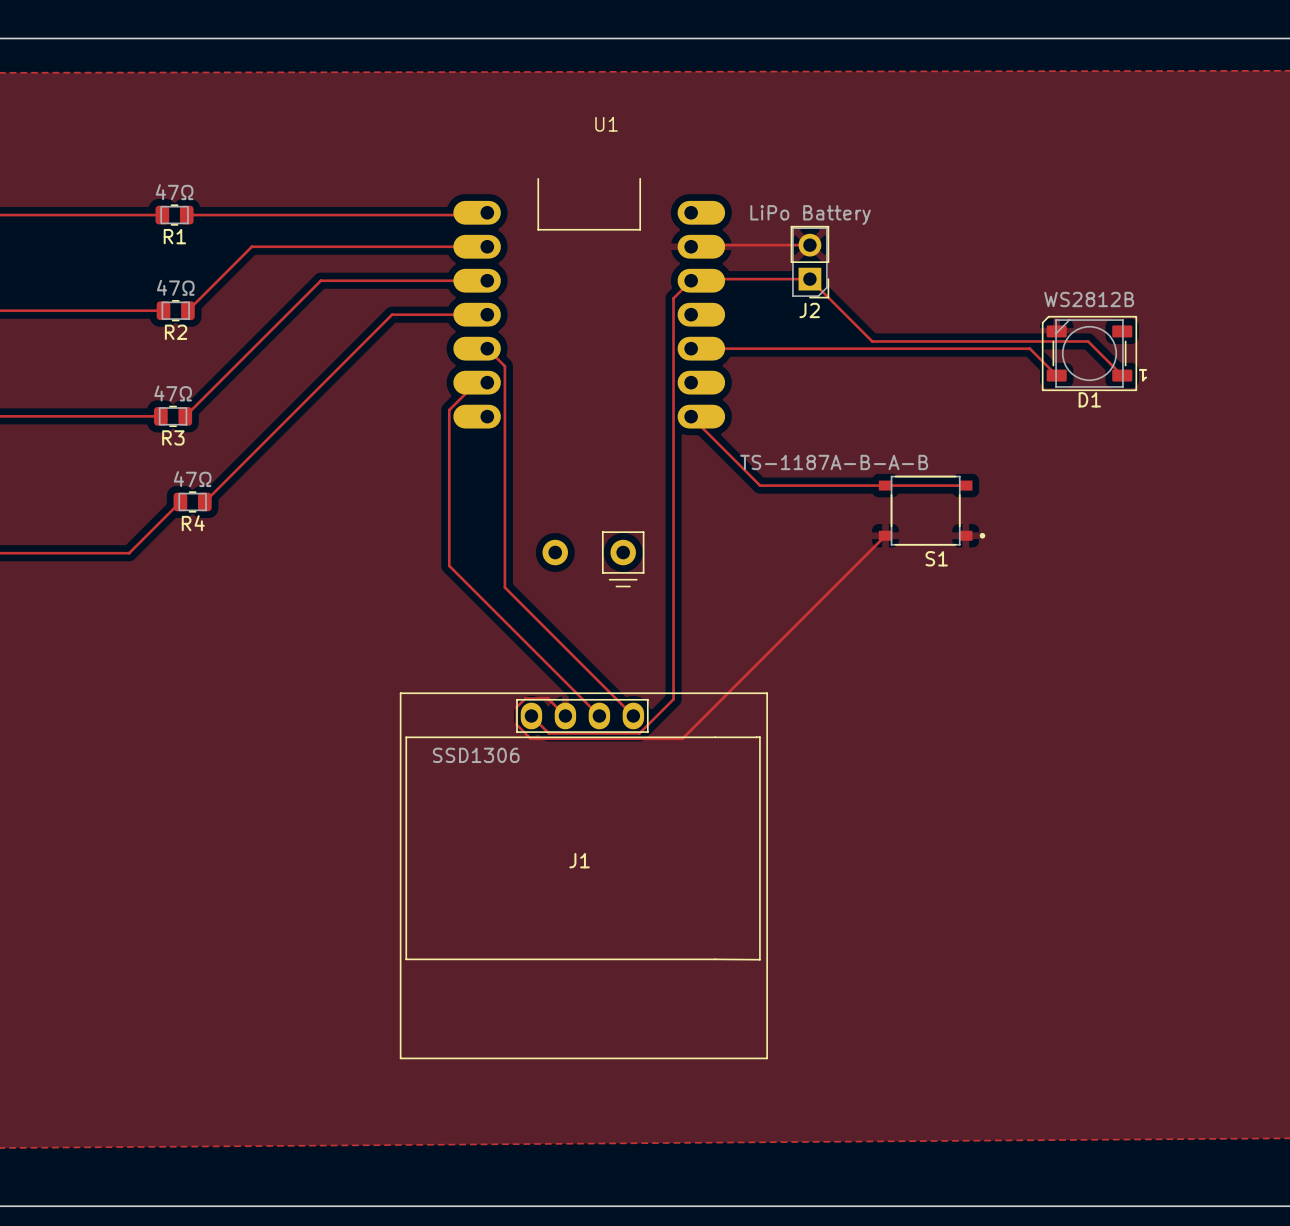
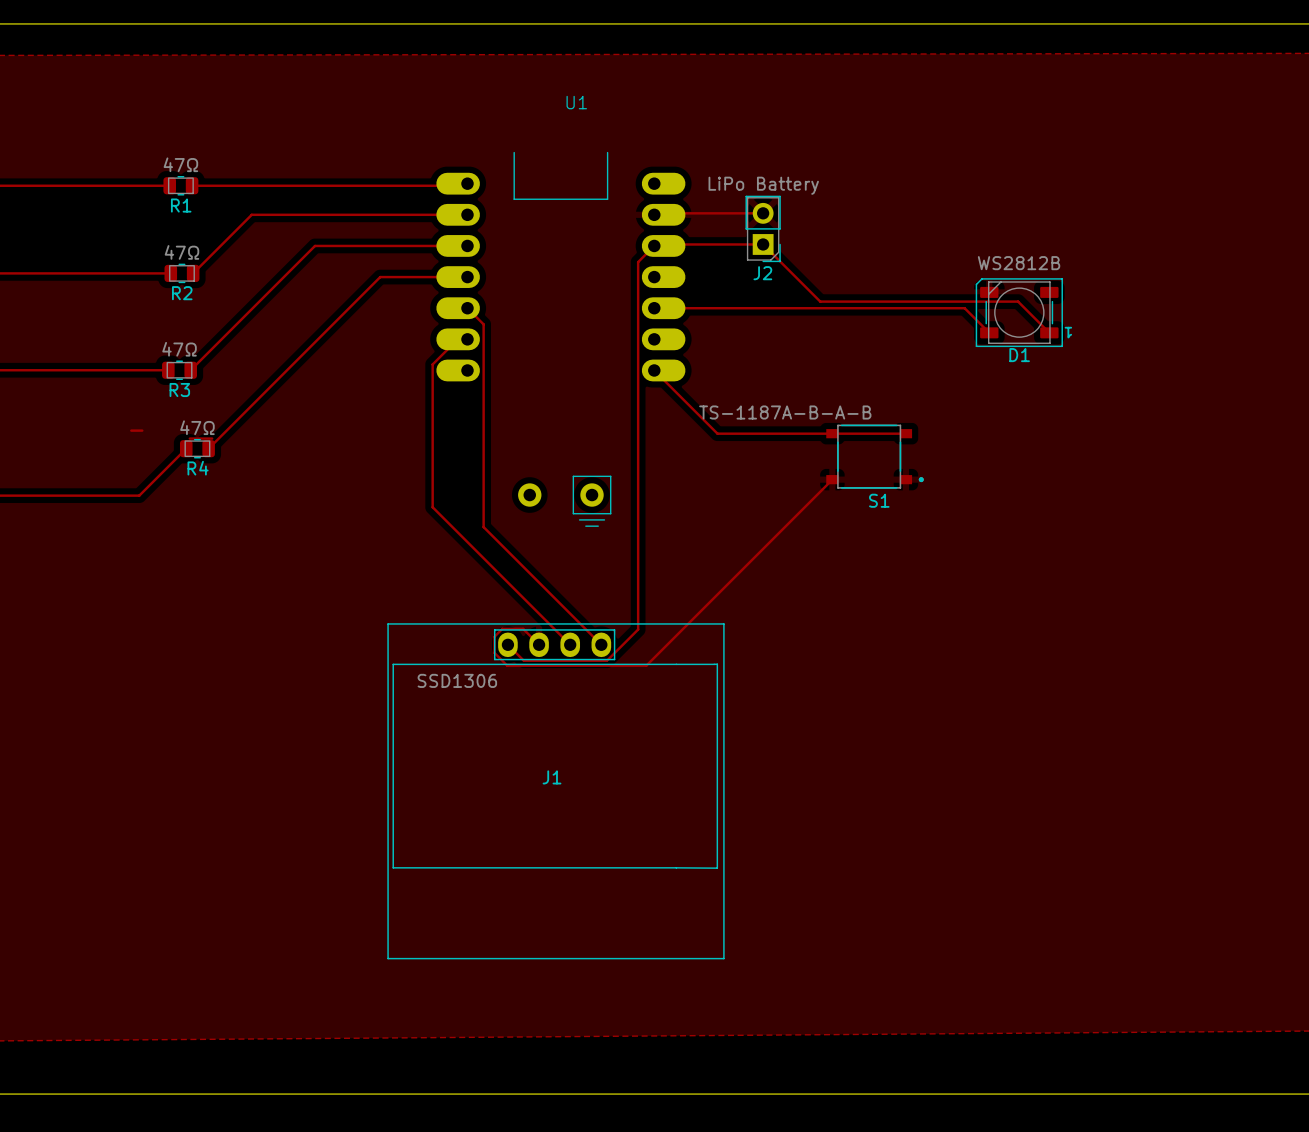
track: none -> (131, 430) (142, 430)
track: none -> (189, 438) (212, 438)

